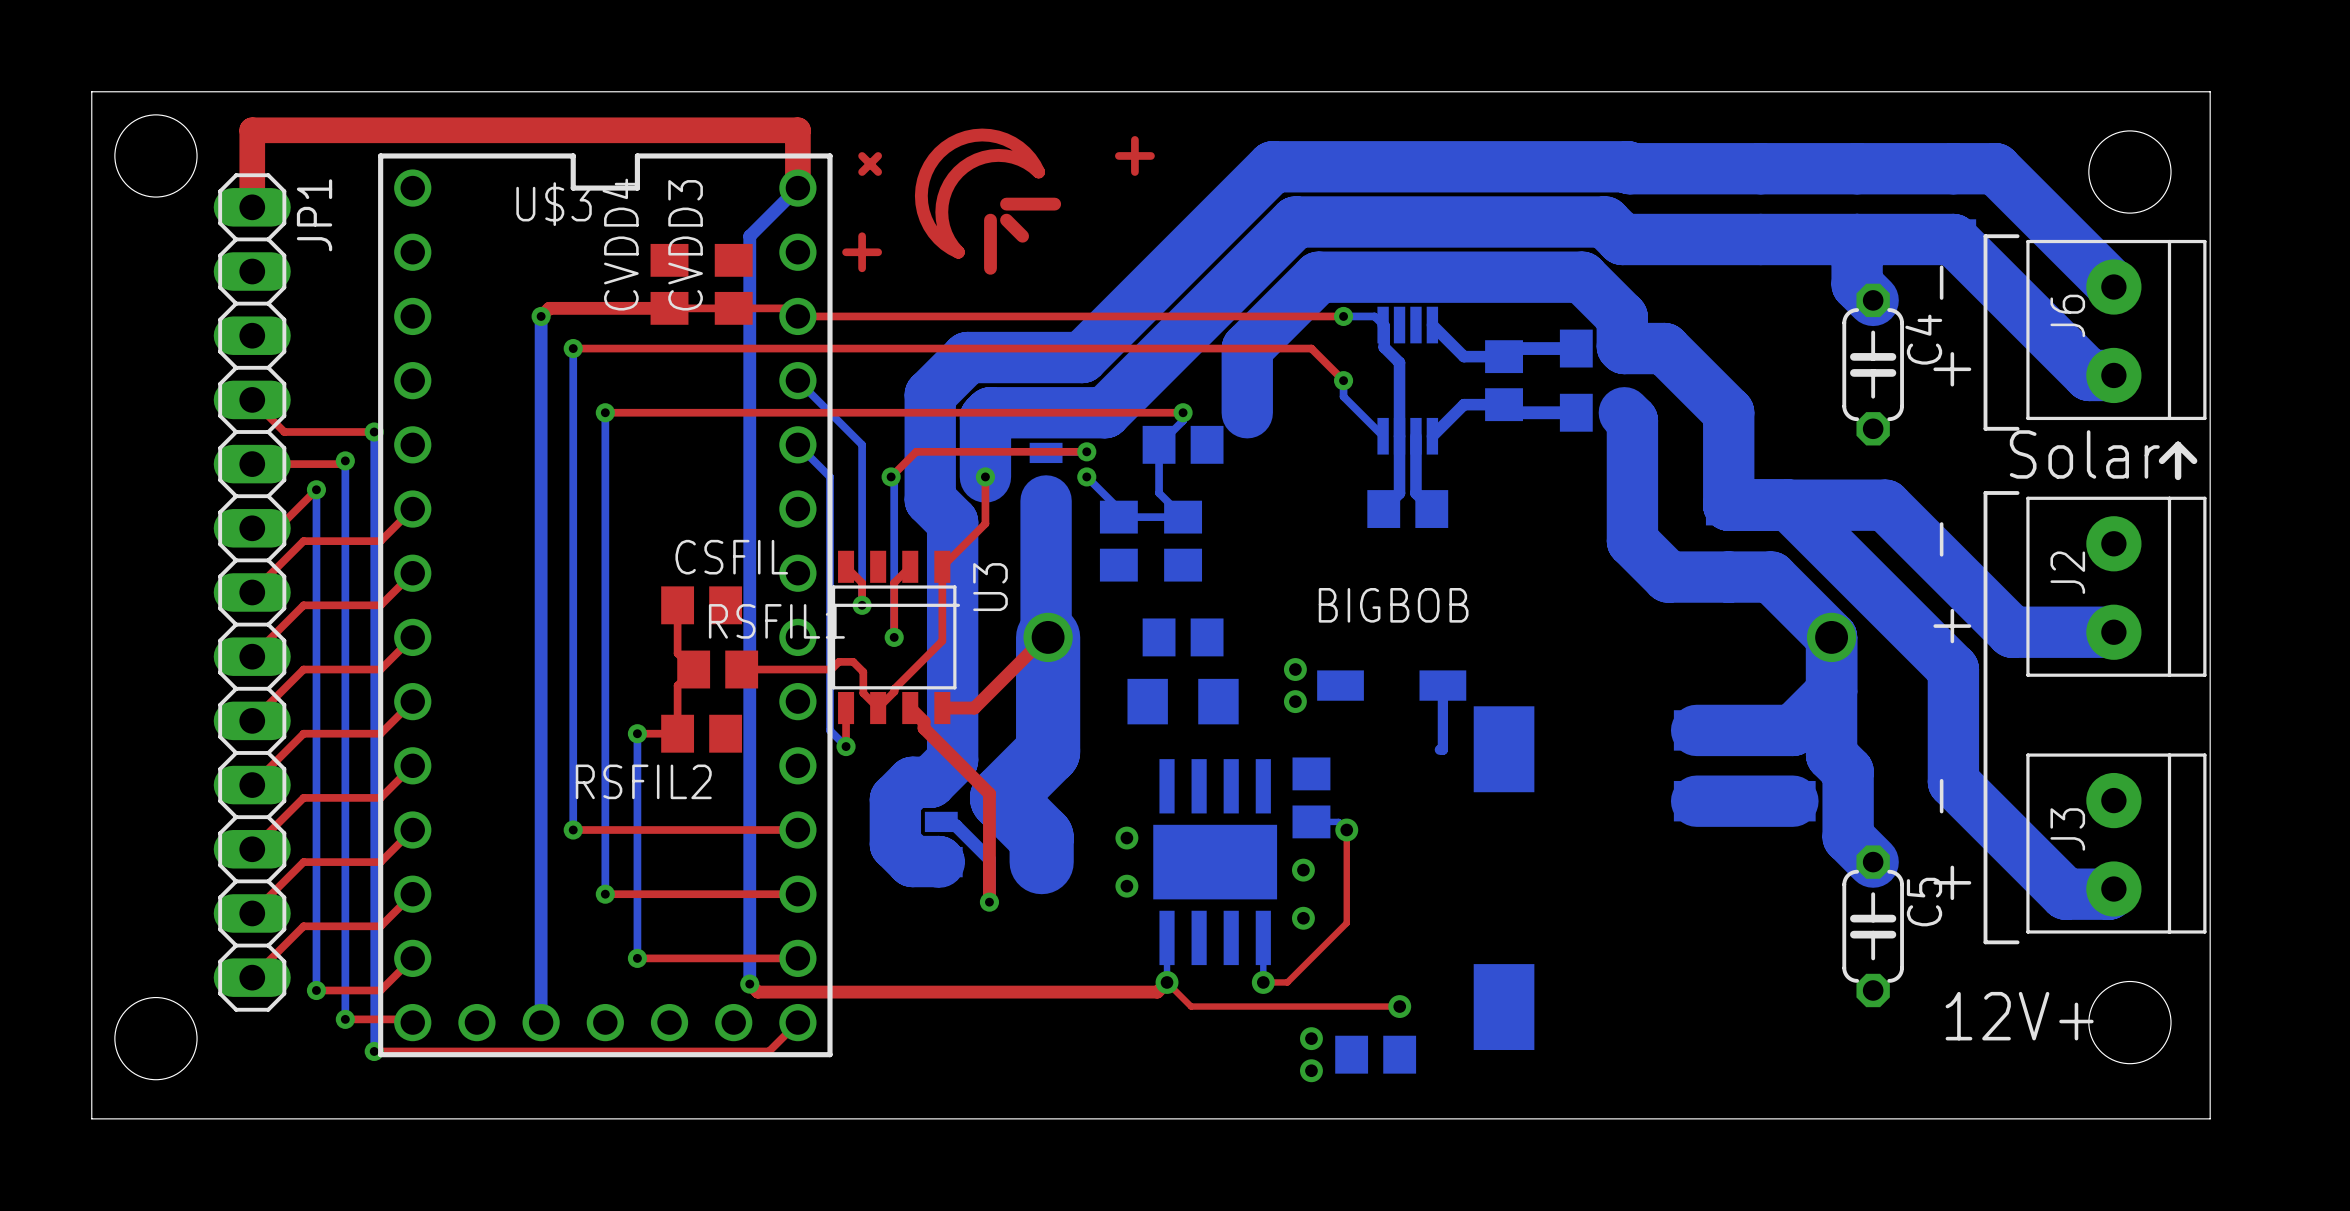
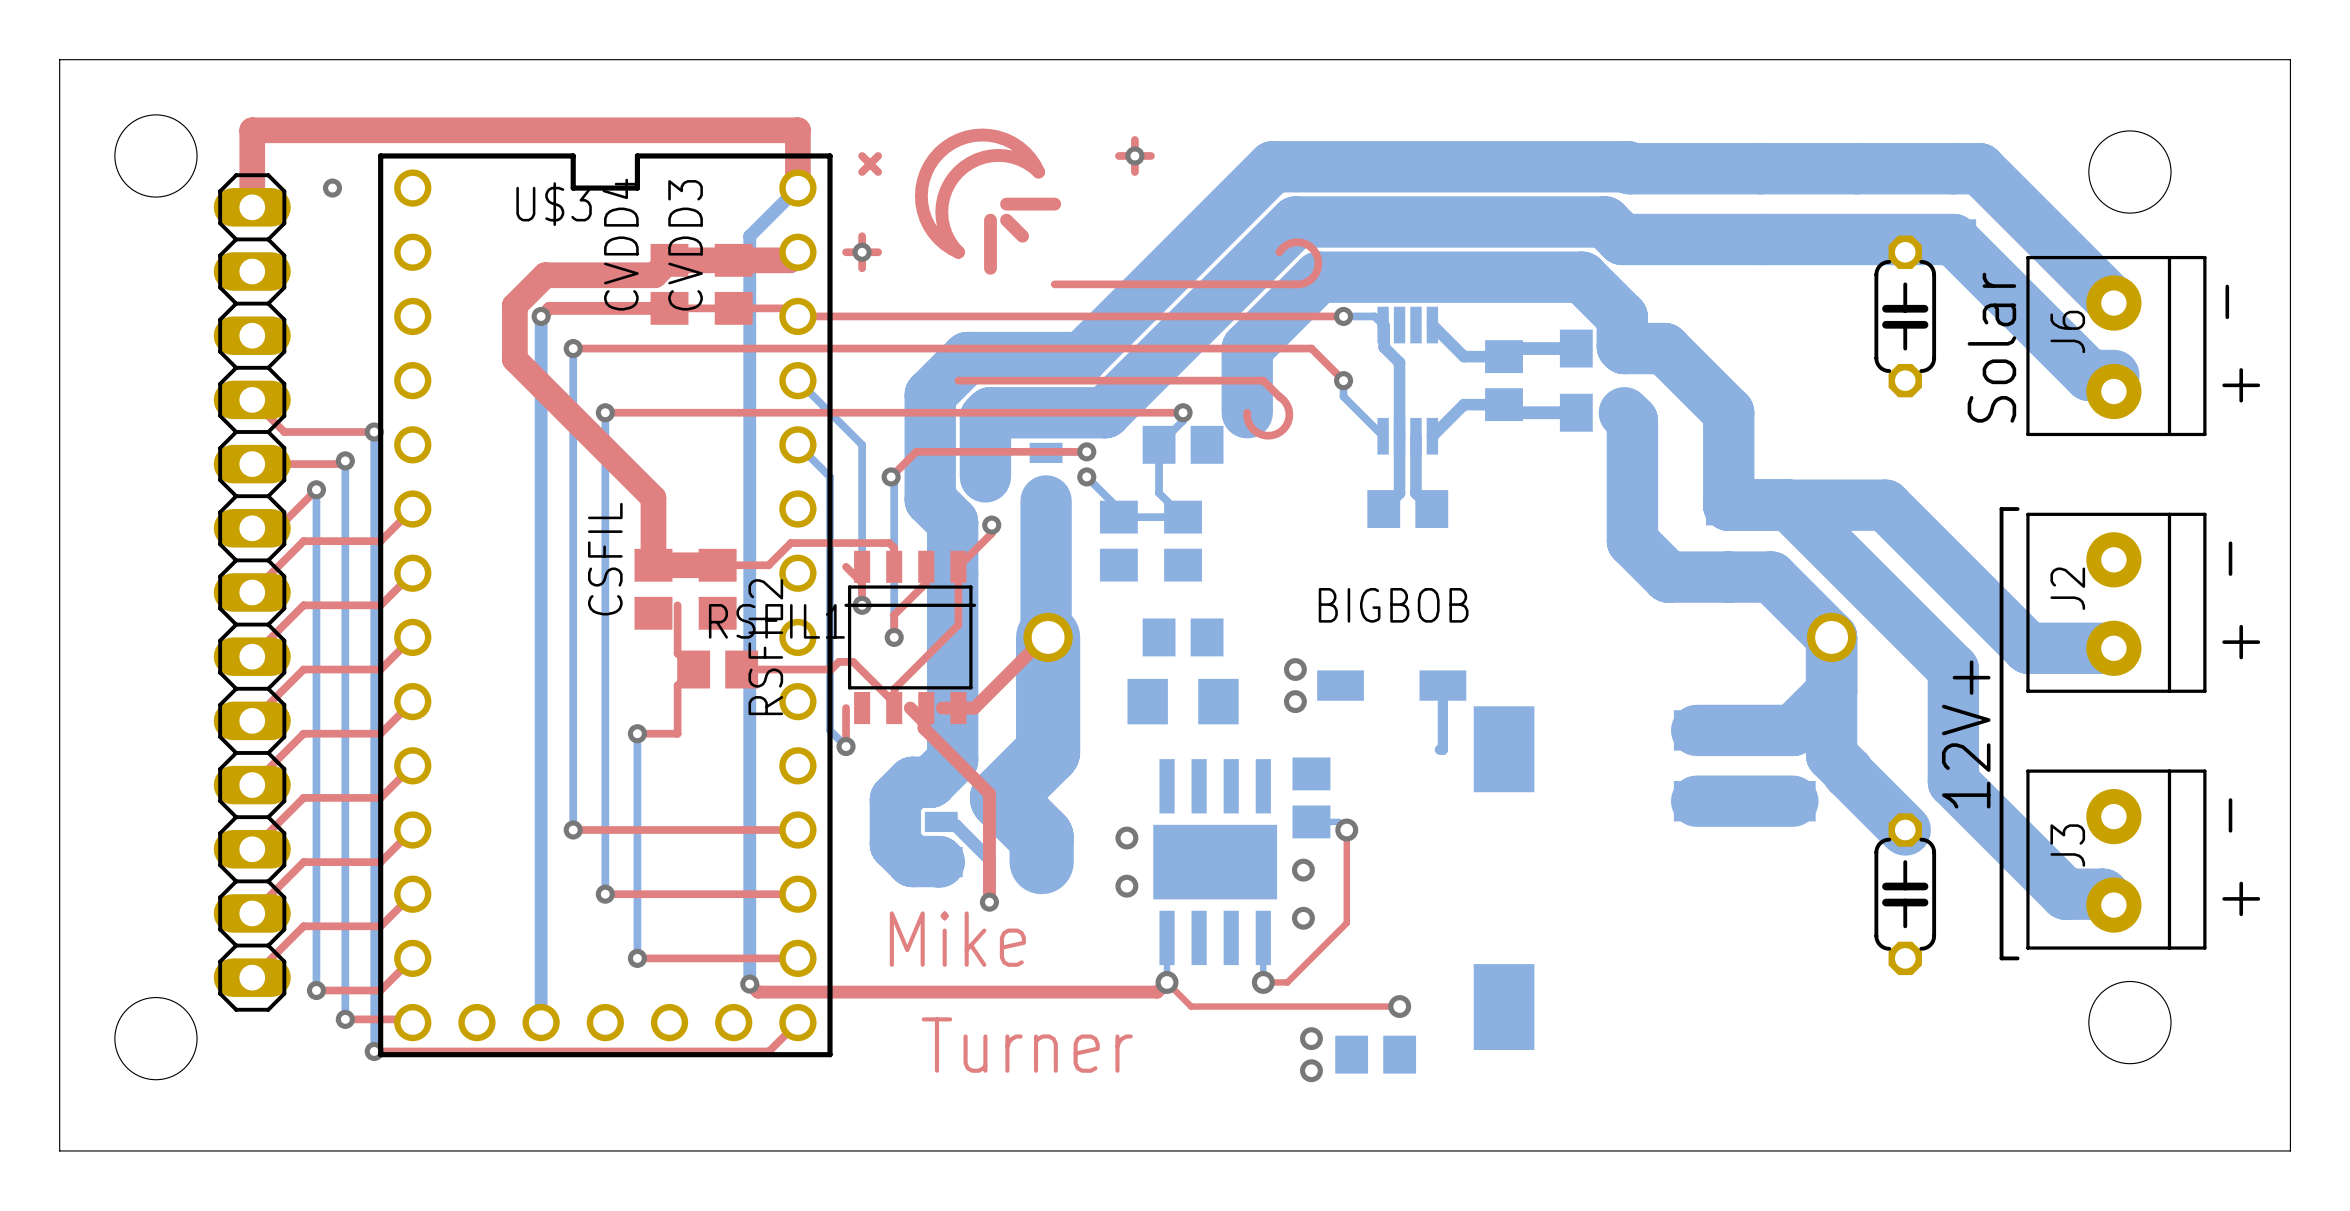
board edge: (91, 91) (2210, 91) (2210, 1118) (91, 1118) (91, 91) -> (59, 59) (59, 1150) (2290, 1150) (2290, 59) (59, 59)
via: none -> (1134, 155)
bottom track: (1979, 168) (1995, 168) (2113, 287) -> (1979, 168) (2113, 303)
via: none -> (332, 188)
JP1 name: JP1 (314, 215) -> none
line: (2017, 236) (1985, 236) (1985, 428) (2017, 428) -> none
bottom track: (1857, 239) (1857, 284) (1873, 300) -> none
top track: none -> (797, 252) (789, 260) (669, 260) (654, 275) (545, 275) (514, 305) (514, 359) (653, 498) (653, 565) (768, 565) (790, 543) (889, 543) (894, 547) (894, 566)
via: none -> (862, 252)
top track: none -> (1279, 252) (1291, 243) (1307, 244) (1314, 251) (1317, 258) (1315, 274) (1308, 281) (1298, 284) (1054, 284)
text: _ (1941, 282) -> none
text: none -> _ (2227, 301)
part: none -> (1905, 316)
J6 position: (2116, 329) -> (2116, 346)
C4: (1873, 364) -> none
text: + (1952, 369) -> none
top track: none -> (958, 380) (1263, 380) (1285, 402) (1289, 416) (1282, 430) (1267, 435) (1253, 429) (1248, 420) (1247, 412)
text: none -> + (2241, 385)
line: (2178, 444) (2178, 476) -> none
line: (2178, 444) (2194, 460) -> none
line: (2178, 444) (2162, 460) -> none
text rotation: 0° (2084, 454) -> 90° counterclockwise (1991, 347)
top track: (985, 476) (985, 523) (942, 566) (942, 640) -> (991, 525) (991, 533) (958, 566) (958, 624) (942, 640)
via position: (985, 476) -> (991, 525)
line: (2017, 492) (1985, 492) (1985, 942) (2017, 942) -> none
line: none -> (2017, 509) (2001, 509) (2001, 958) (2017, 958)
text: _ (1941, 539) -> none
CSFIL name position: CSFIL (731, 557) -> CSFIL (605, 559)
text: none -> _ (2230, 558)
top track: (910, 566) (894, 582) (894, 614) -> (926, 566) (926, 582) (894, 614)
J2 position: (2116, 586) -> (2116, 602)
U3 name: U3 (990, 587) -> none
CSFIL rotation: 0° (701, 605) -> 90° clockwise (653, 589)
CSFIL position: (701, 605) -> (653, 589)
text: + (1952, 626) -> none
bottom track: (2012, 632) (2113, 632) -> (2012, 632) (2028, 648) (2113, 648)
U3 position: (894, 637) -> (910, 637)
text: none -> + (2241, 642)
top track: (863, 672) (863, 693) (878, 708) (894, 691) -> (863, 672) (894, 702) (894, 708)
RSFIL2 rotation: 0° (701, 733) -> 90° clockwise (717, 589)
RSFIL2 position: (701, 733) -> (717, 589)
bottom track: (1848, 772) (1848, 837) (1873, 862) -> (1848, 772) (1905, 830)
RSFIL2 name position: RSFIL2 (643, 781) -> RSFIL2 (765, 647)
text: _ (1941, 796) -> none
text: none -> _ (2230, 815)
J3 position: (2116, 843) -> (2116, 859)
text: + (1952, 882) -> none
part: none -> (1905, 894)
text: none -> + (2241, 898)
C5: (1873, 926) -> none
text: none -> Mike (957, 939)
text rotation: 0° (2019, 1016) -> 90° counterclockwise (1966, 734)
text position: 12V+ (2019, 1016) -> 12V+ (1966, 734)
text: none -> Turner (1027, 1045)

